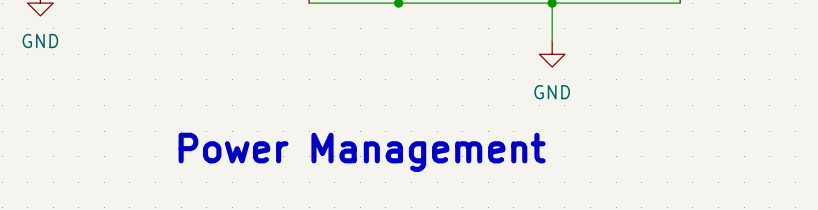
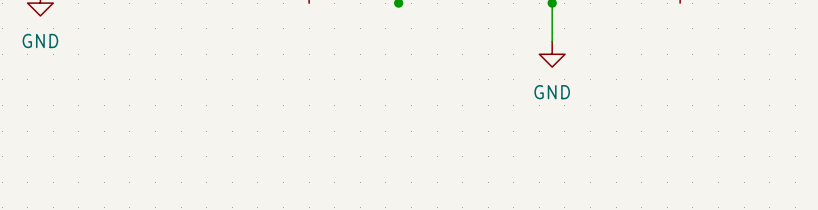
wire: (309, 3) (680, 3) -> none
text: Power Management (362, 152) -> none

